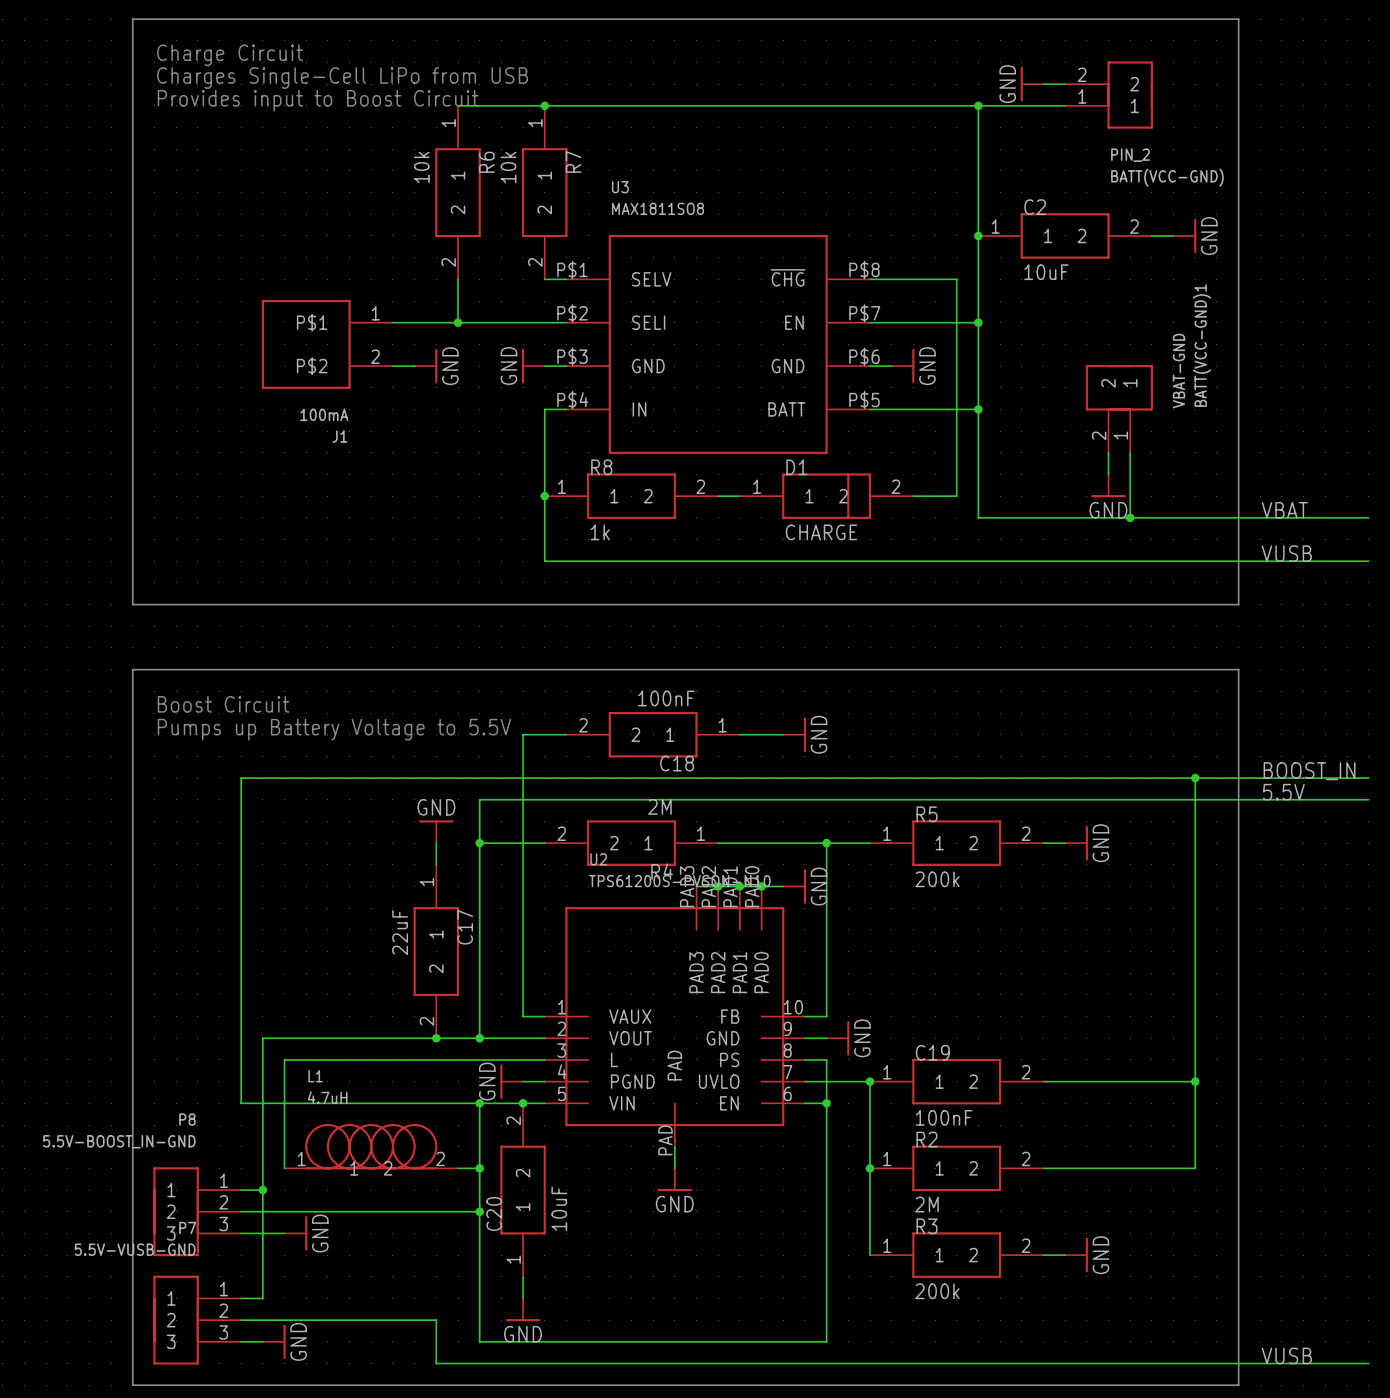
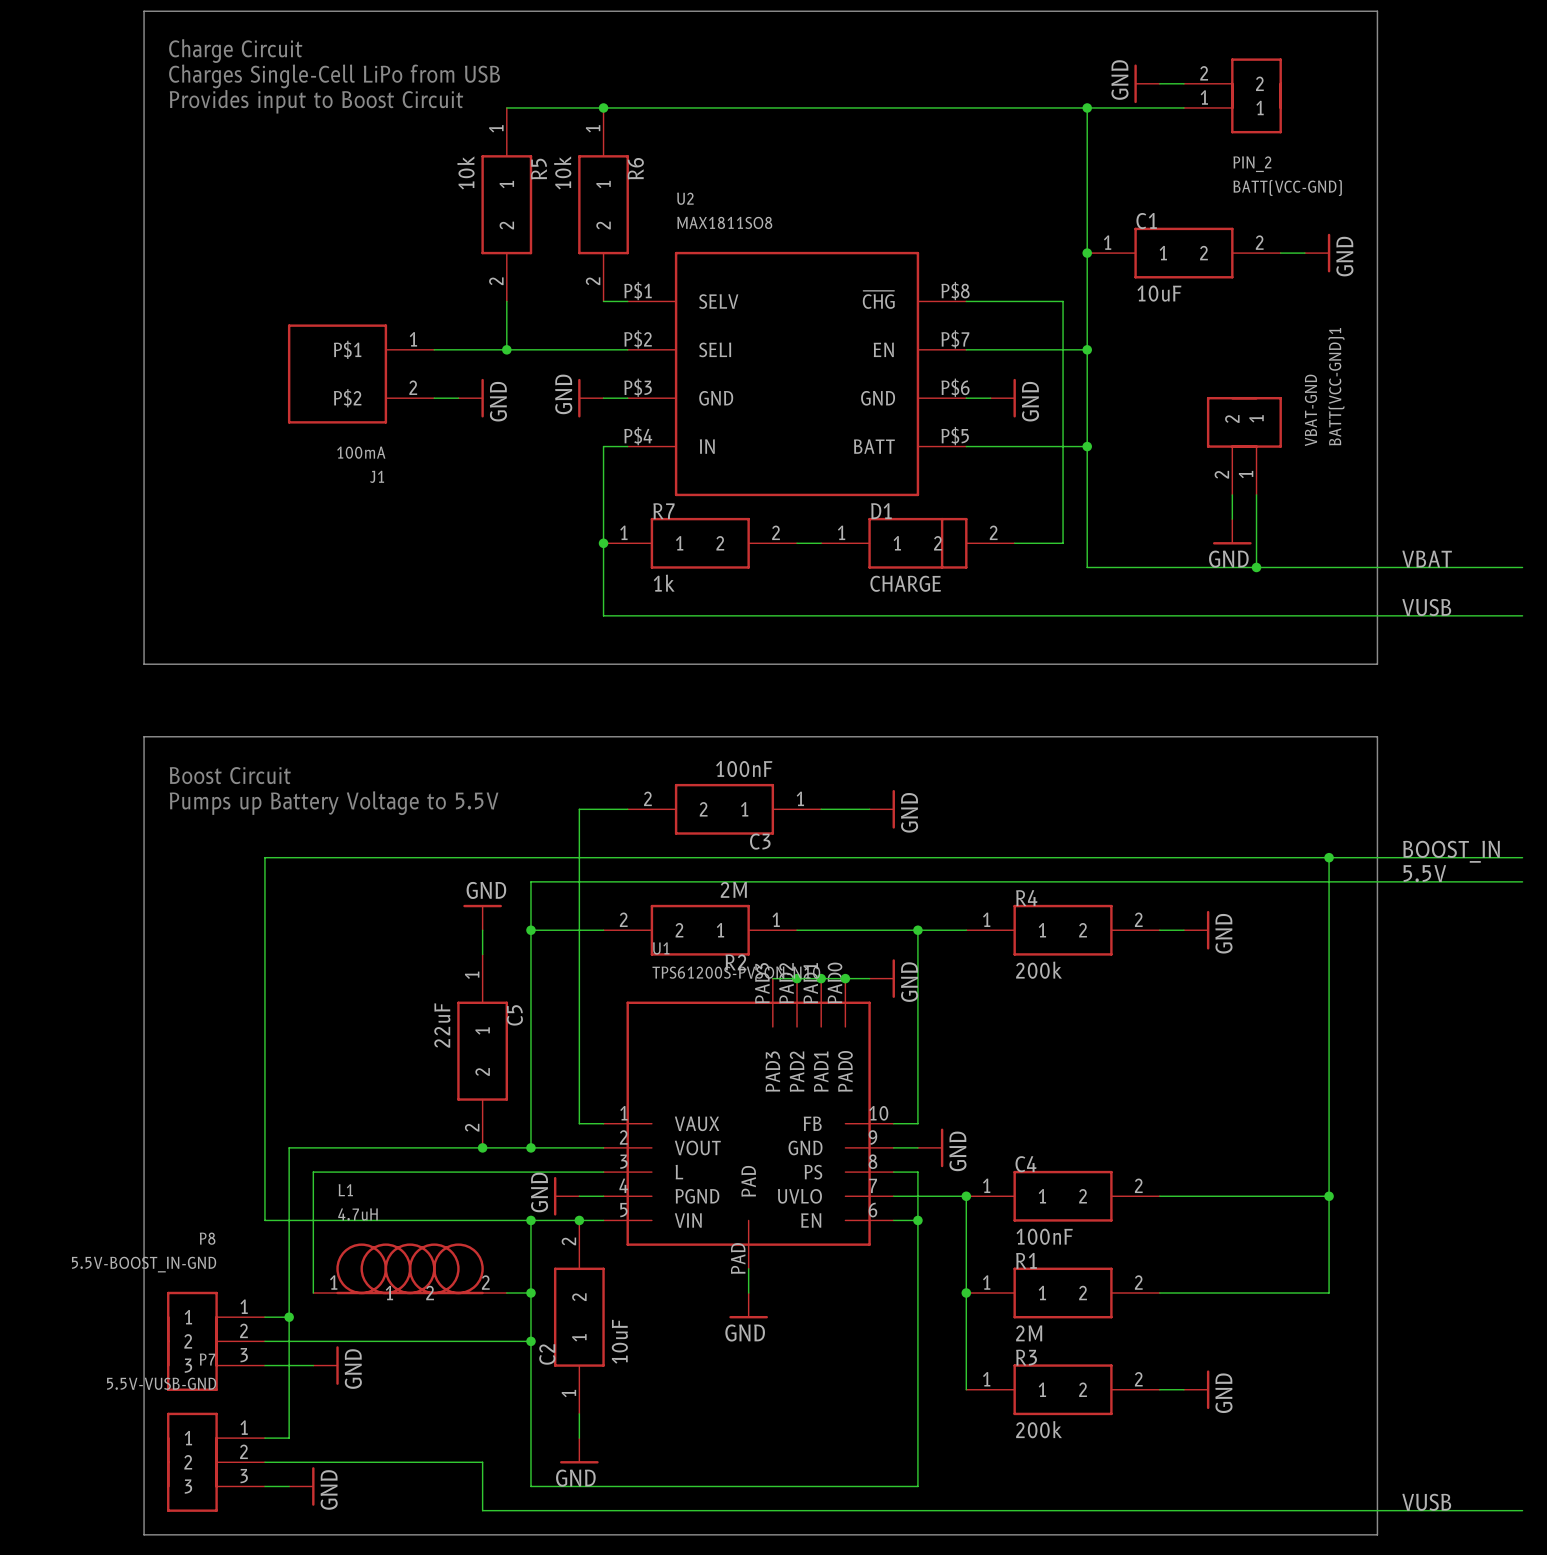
R7 name: R7 (573, 161) -> R6 (635, 168)
R6 name: R6 (486, 162) -> R5 (539, 169)
U3 name: U3 (620, 187) -> U2 (685, 198)
C2 name: C2 (1035, 207) -> C1 (1146, 221)
R8 name: R8 (601, 467) -> R7 (663, 511)
C18 name: C18 (677, 763) -> C3 (760, 841)
R5 name: R5 (927, 814) -> R4 (1026, 898)
U2 name: U2 (598, 859) -> U1 (661, 948)
R4 name: R4 (662, 871) -> R2 (735, 962)
C17 name: C17 (465, 927) -> C5 (514, 1015)
C19 name: C19 (932, 1052) -> C4 (1025, 1164)
R2 name: R2 (927, 1139) -> R1 (1026, 1260)
C20 name: C20 (494, 1213) -> C2 (547, 1354)

